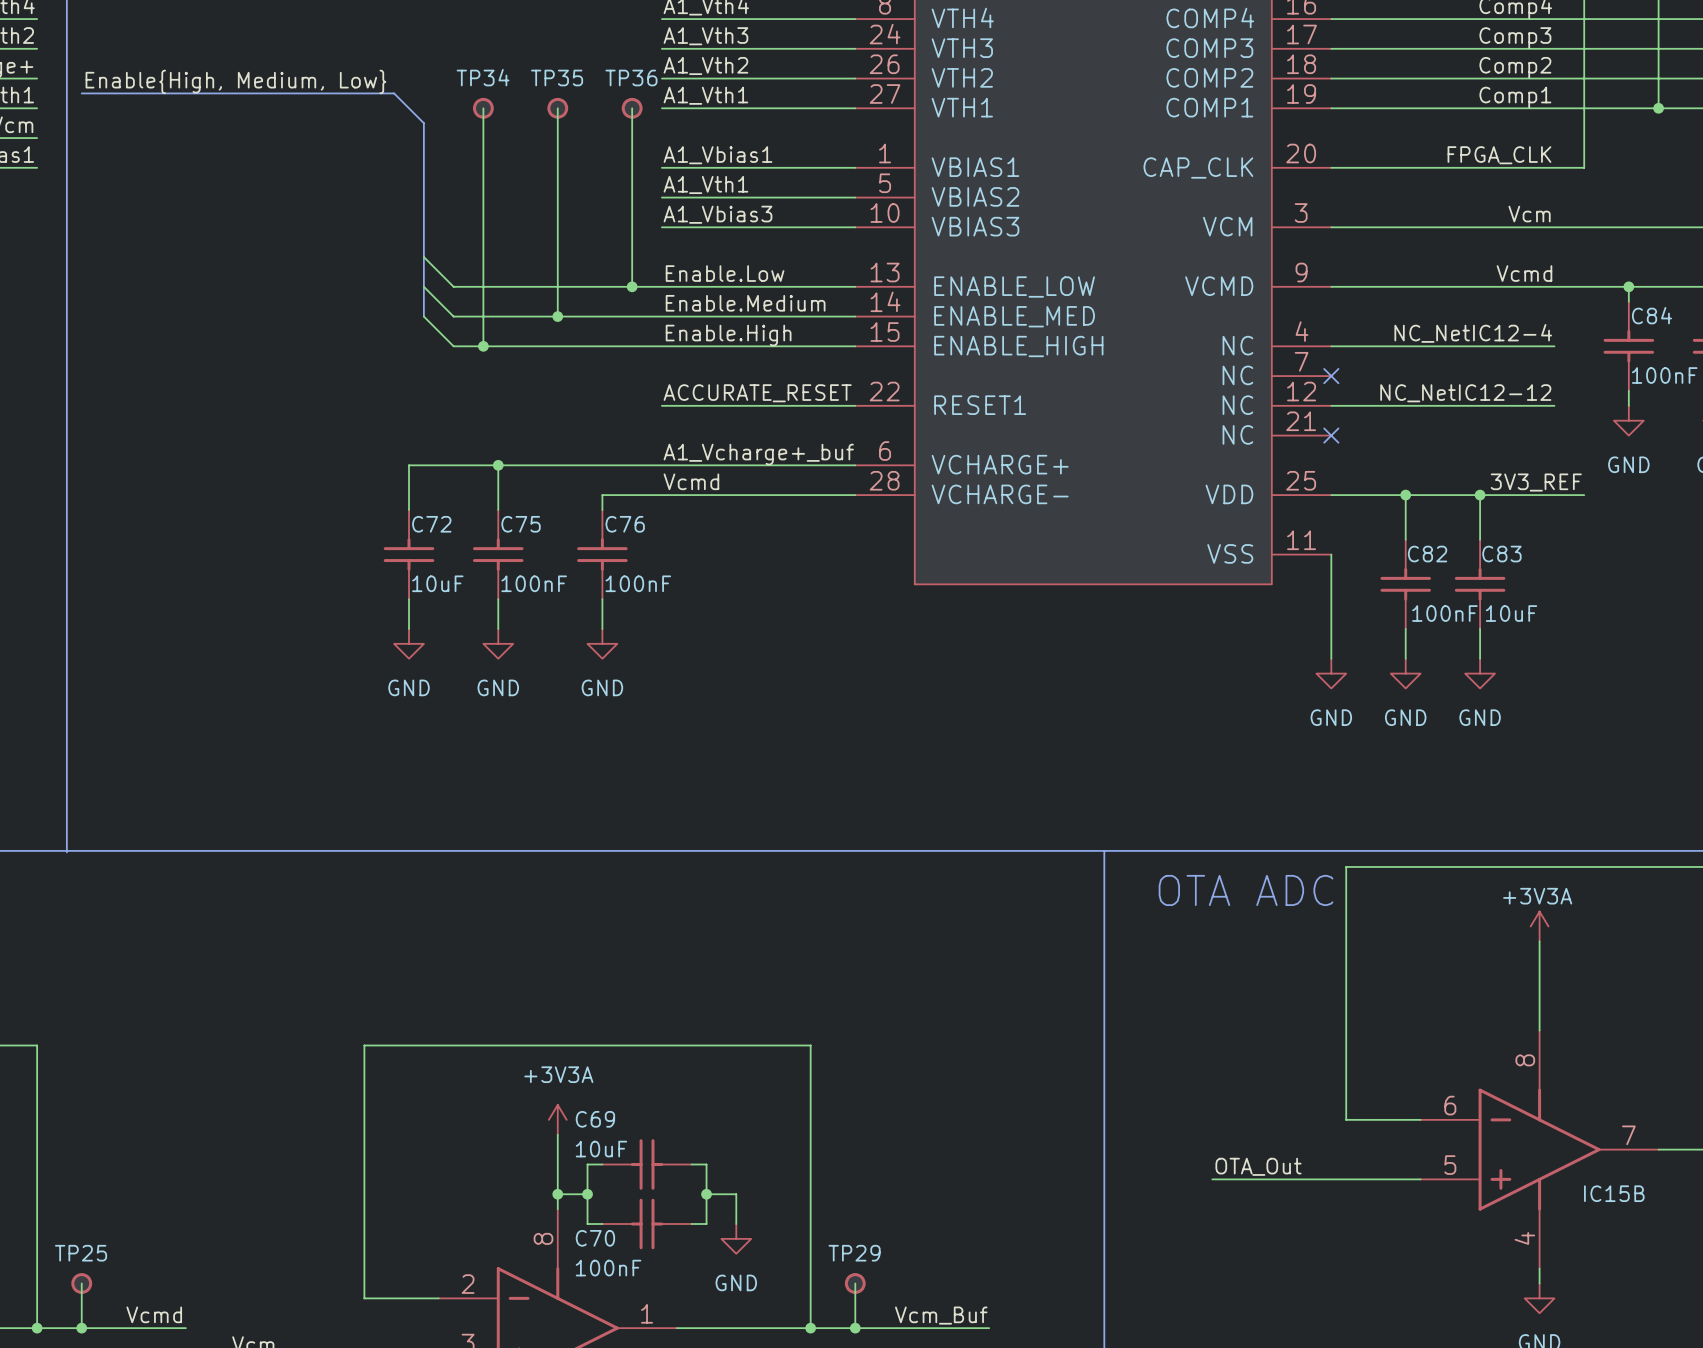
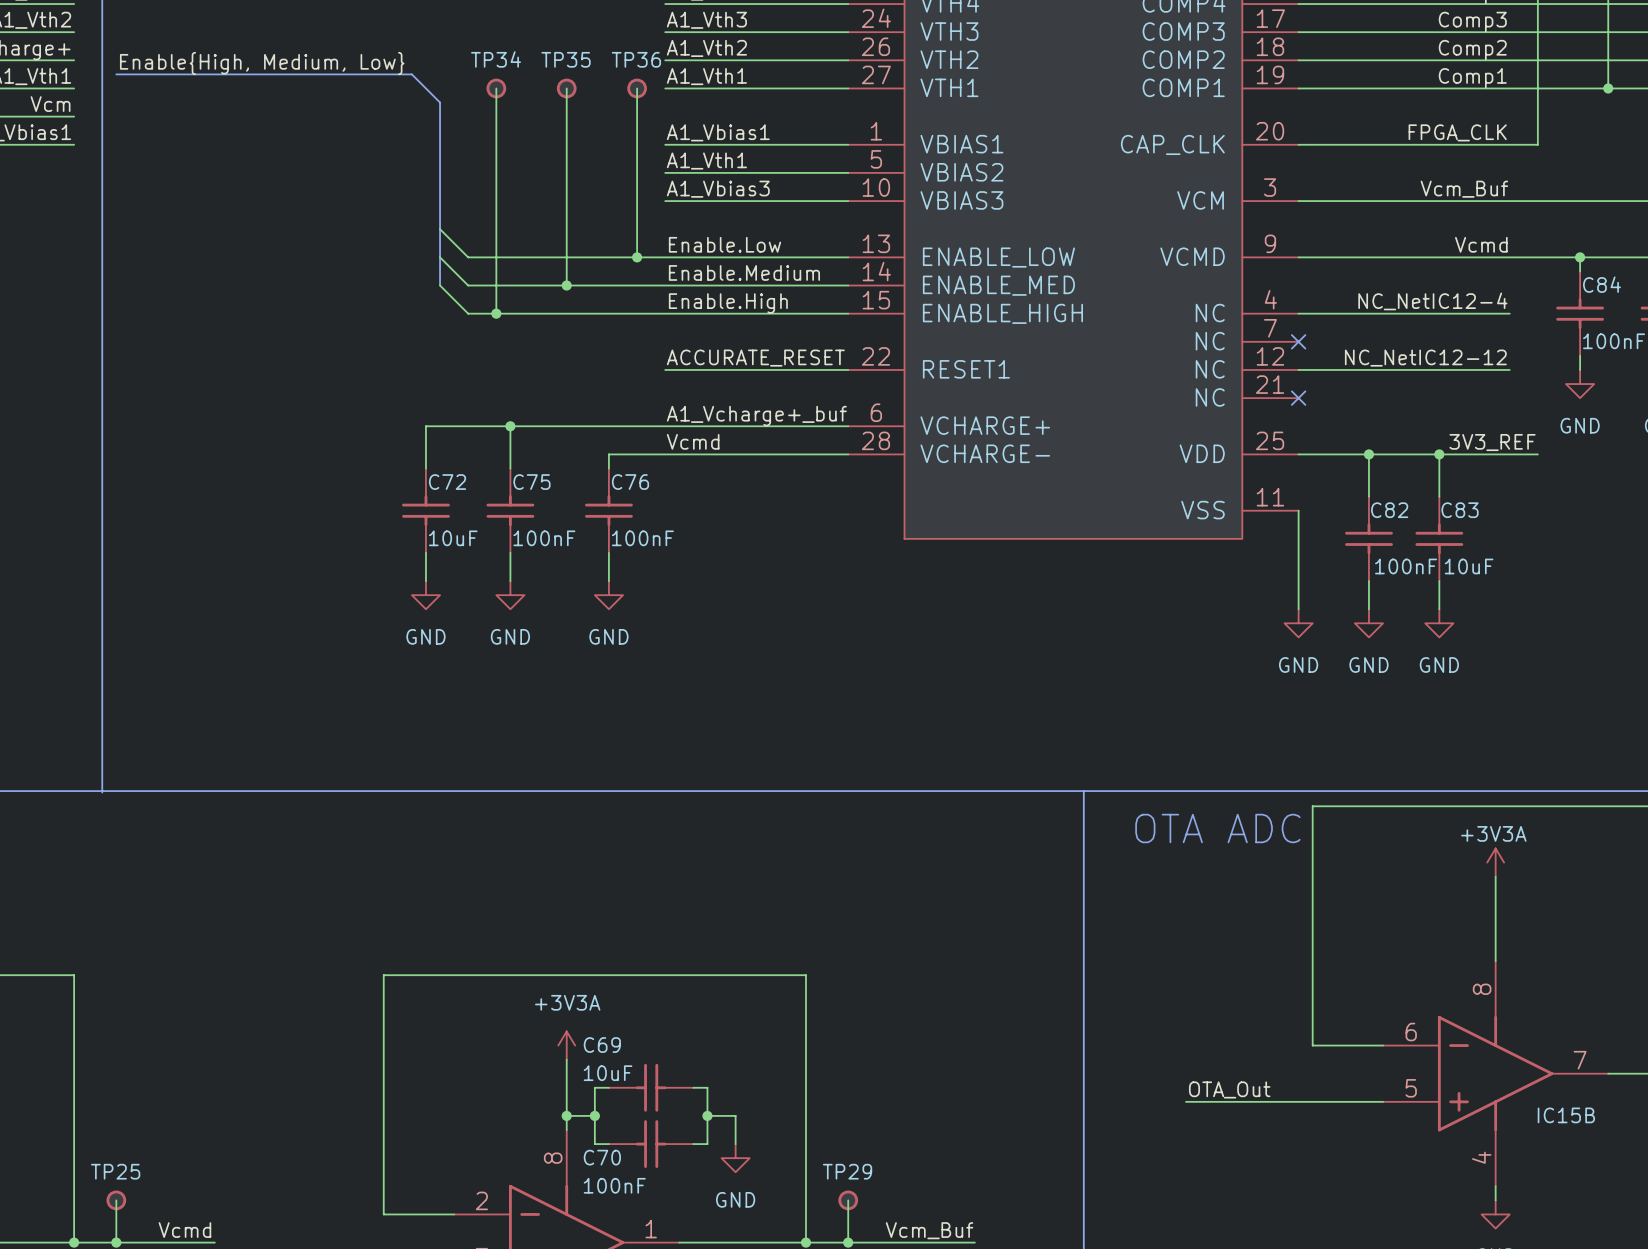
label: Vcm (1529, 214) -> Vcm_Buf (1464, 189)

